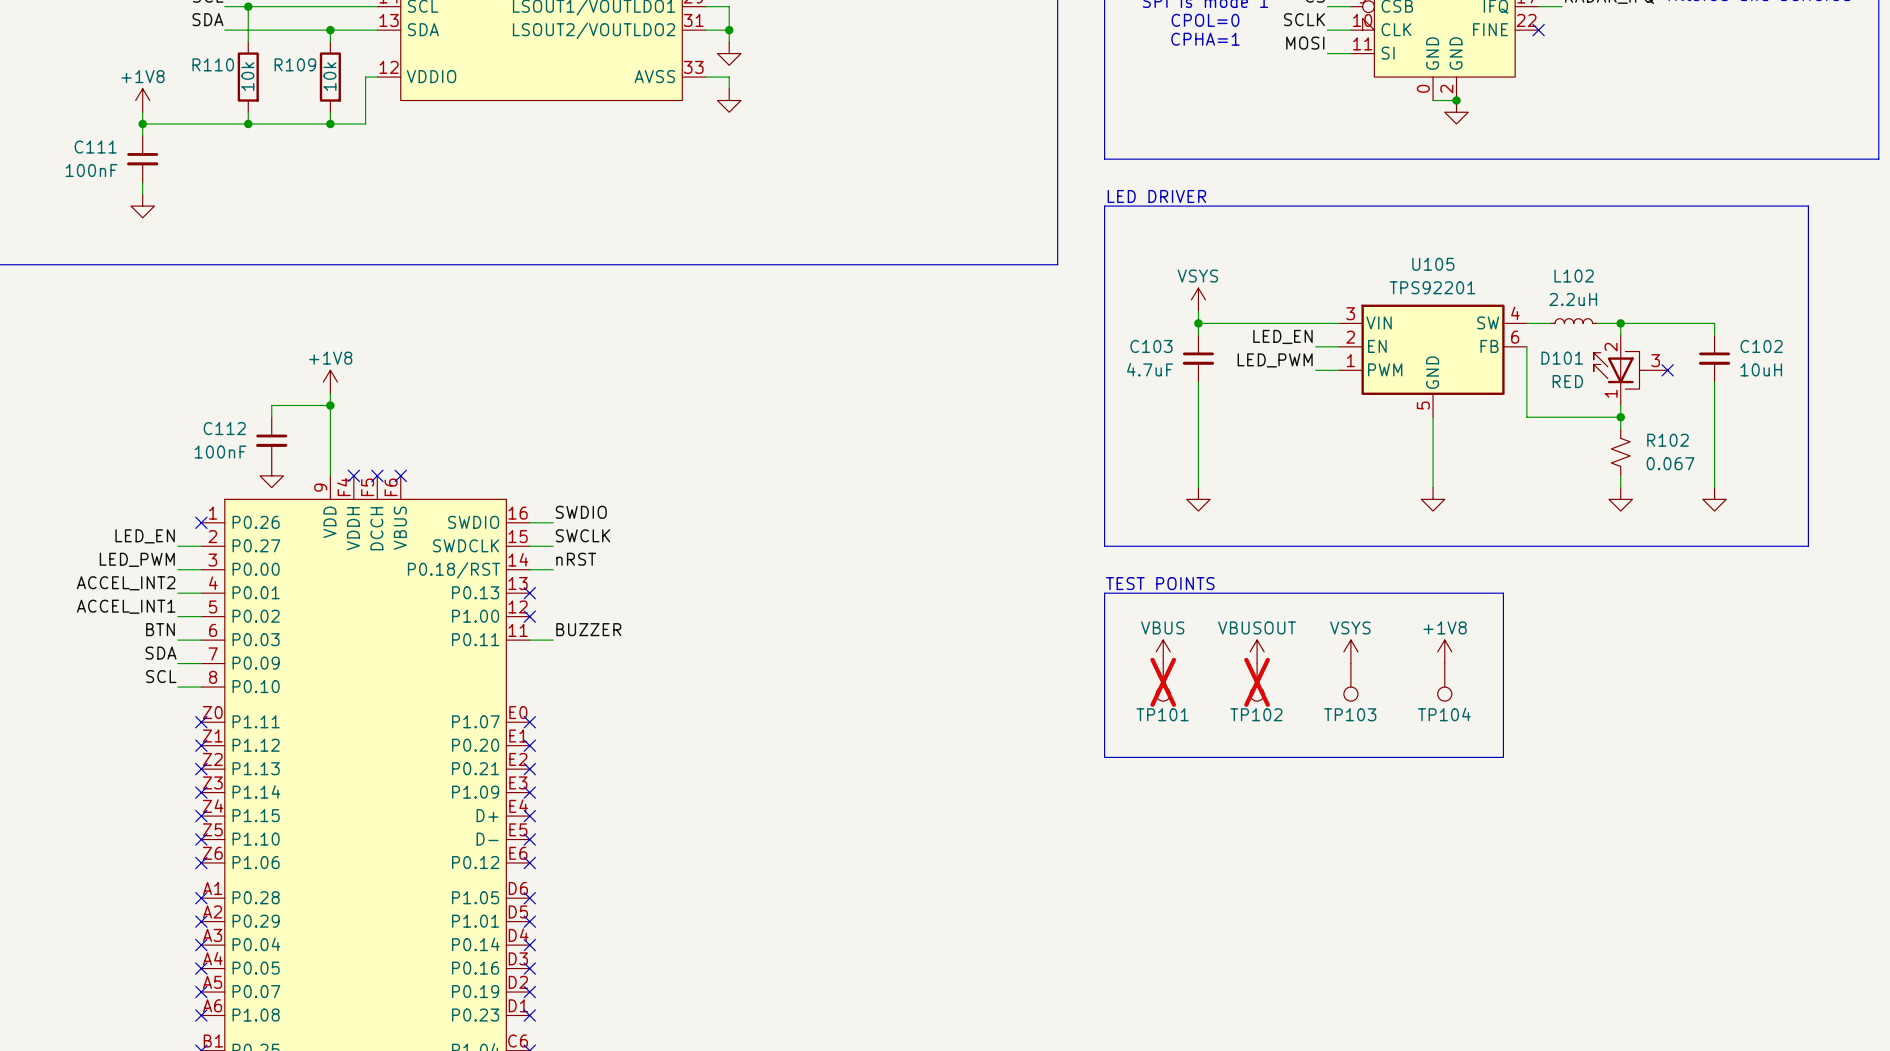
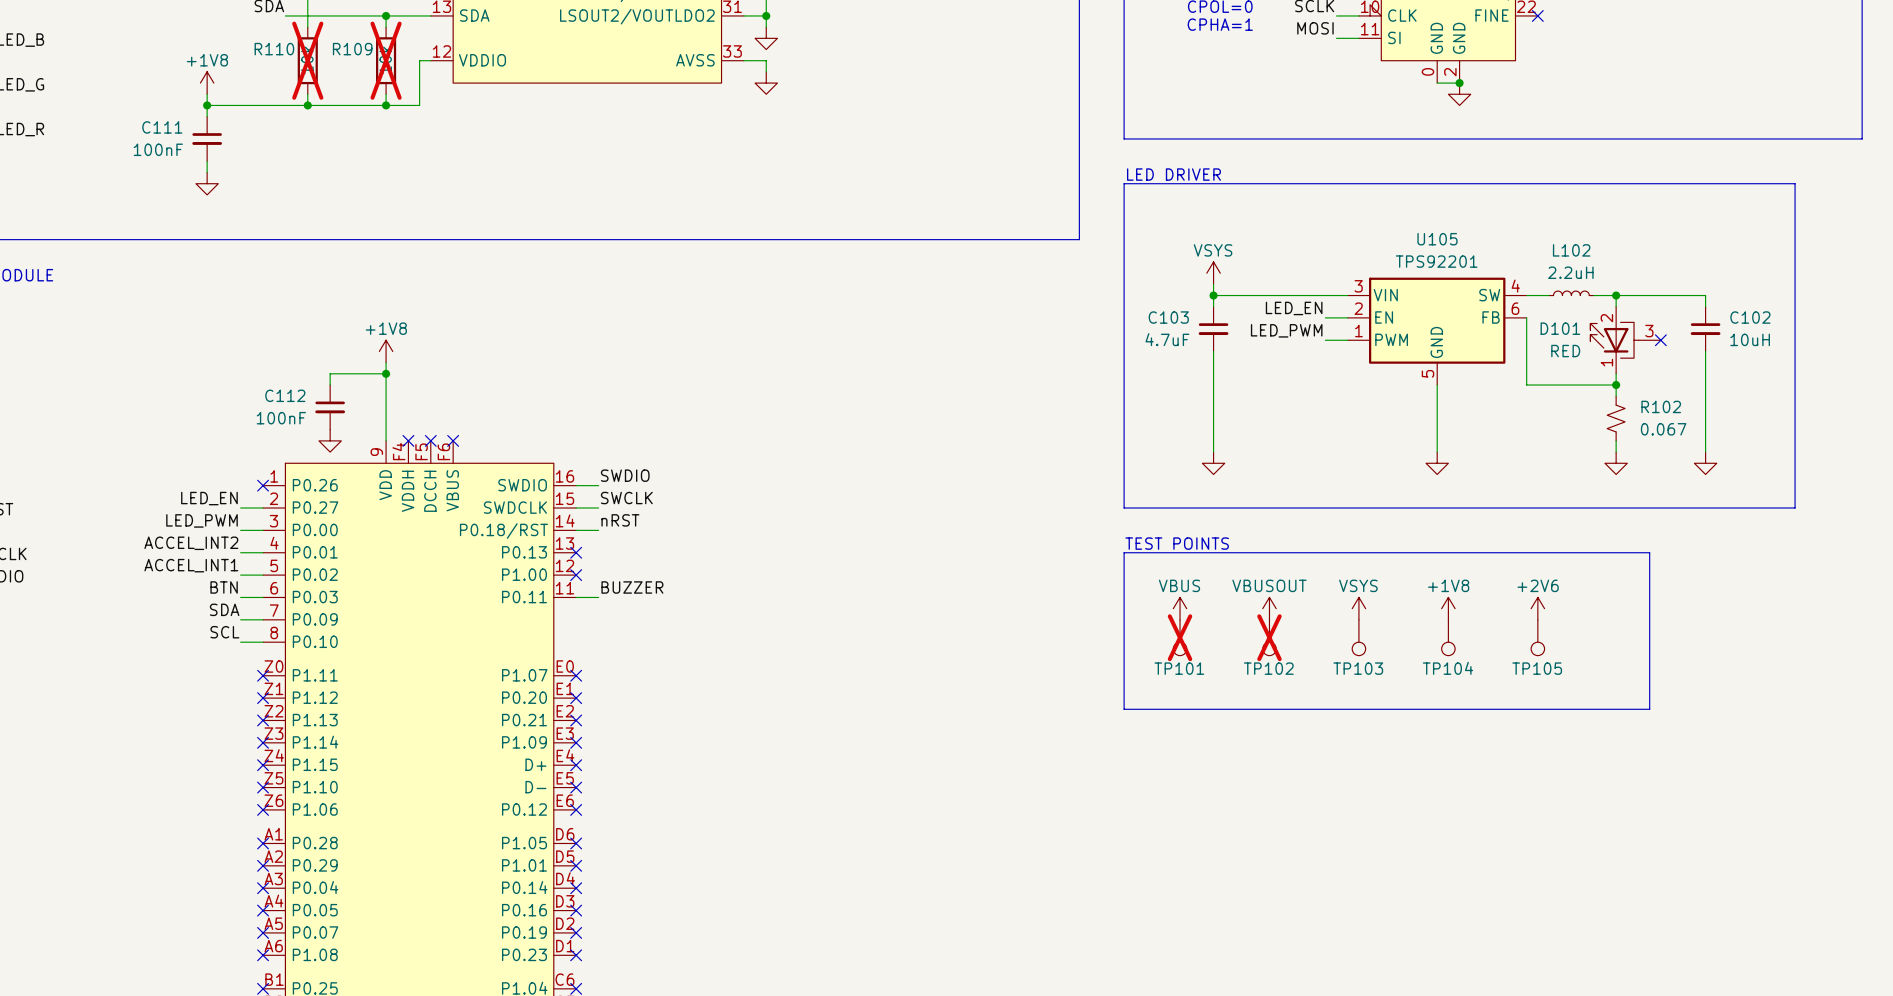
R110 do-not-place cross: none -> (307, 60)
R109 do-not-place cross: none -> (386, 60)
line: (1503, 593) (1503, 757) -> (1504, 552) (1649, 552) (1649, 709) (1504, 709)
power symbol: none -> +2V6 (1537, 608)
TP105: none -> (1537, 637)

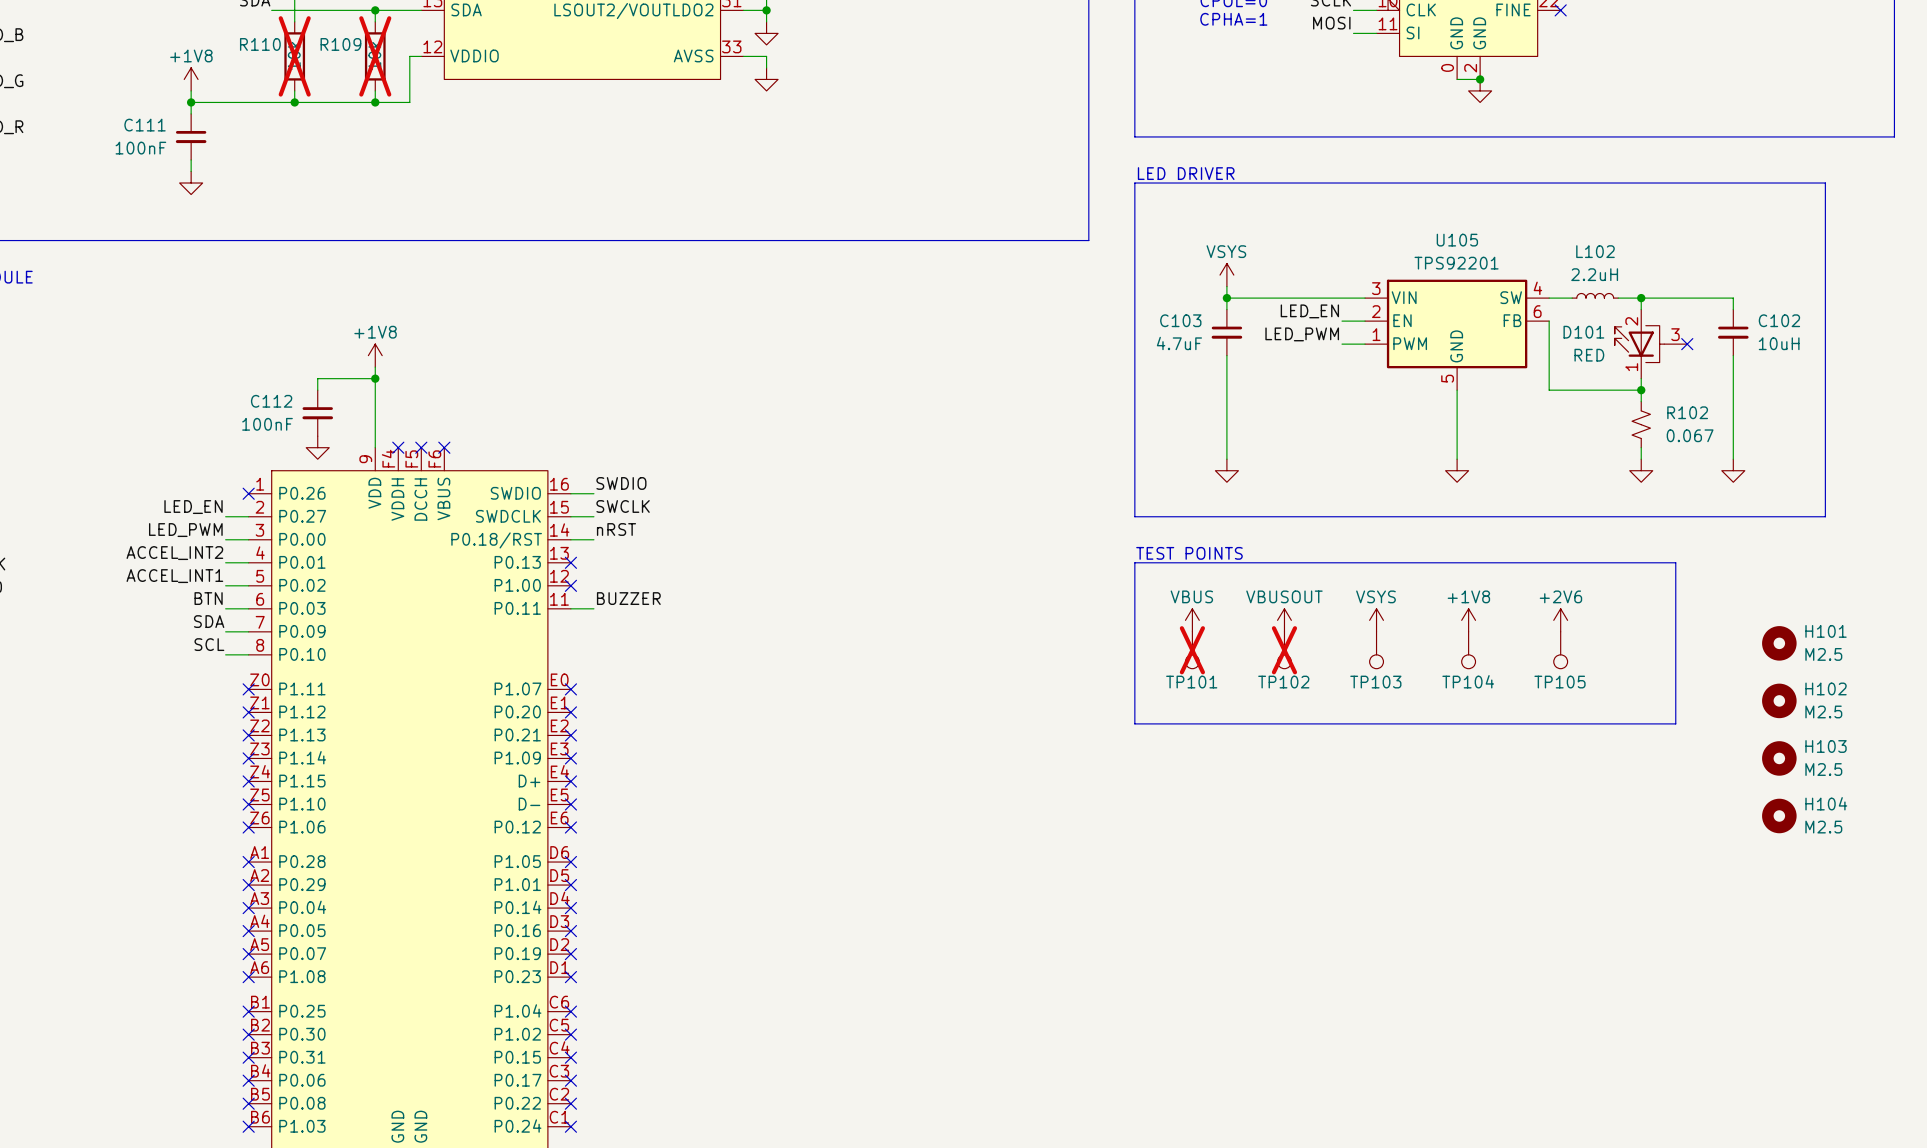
H101: none -> M2.5 (1779, 643)
H102: none -> M2.5 (1779, 700)
H103: none -> M2.5 (1779, 758)
H104: none -> M2.5 (1779, 815)

